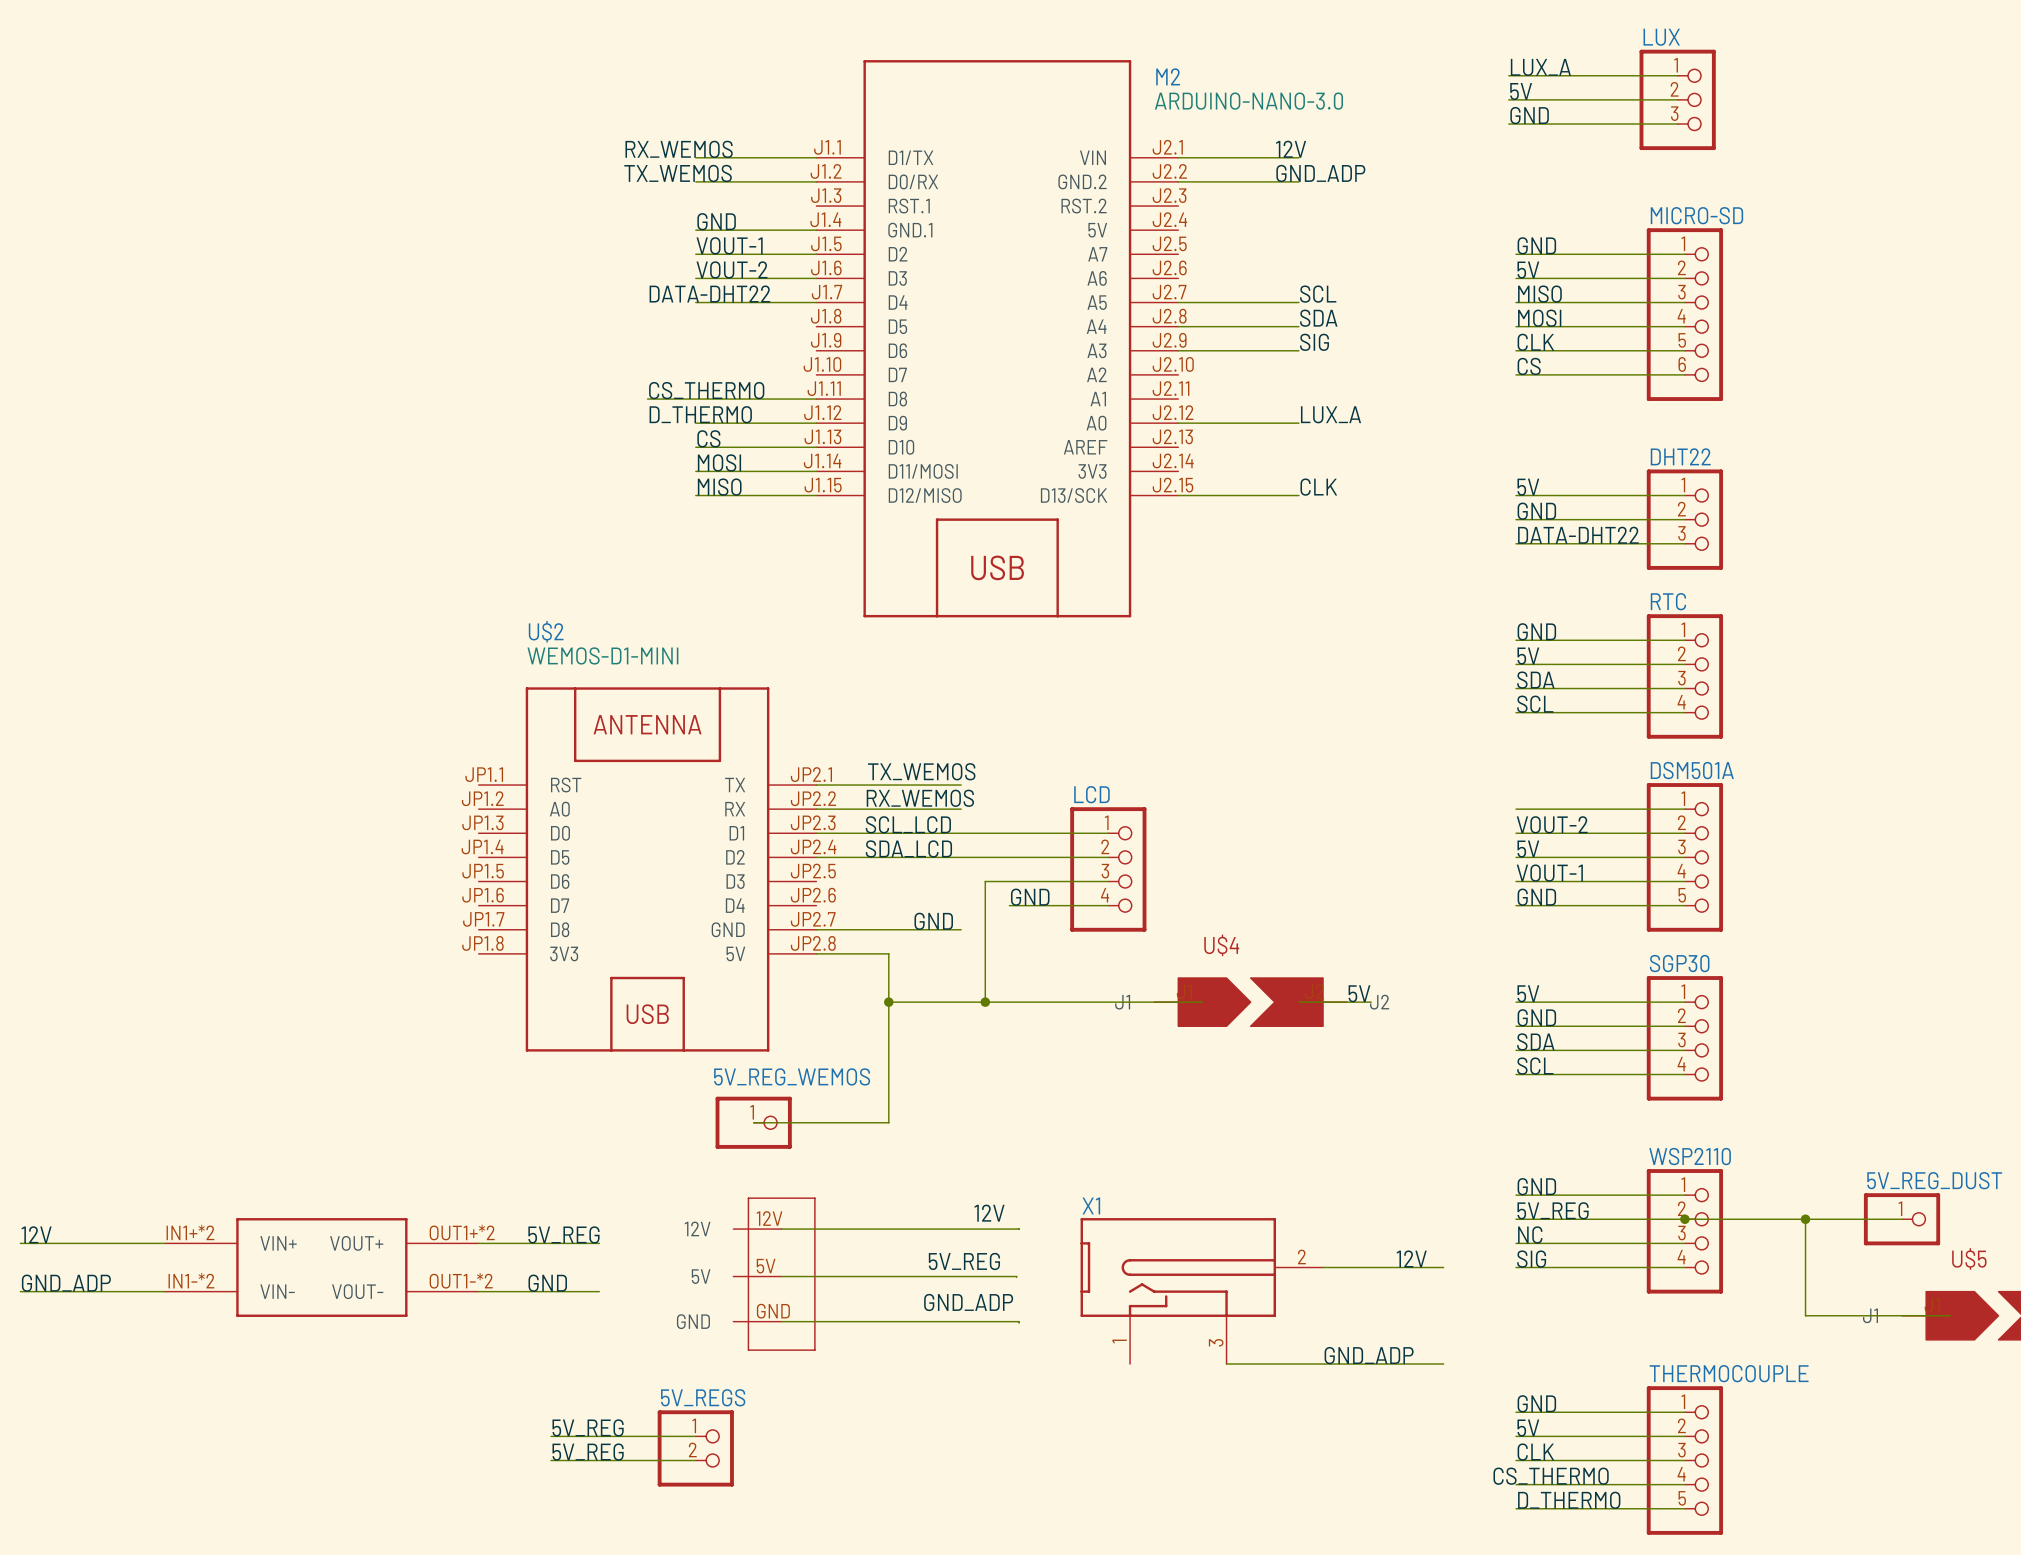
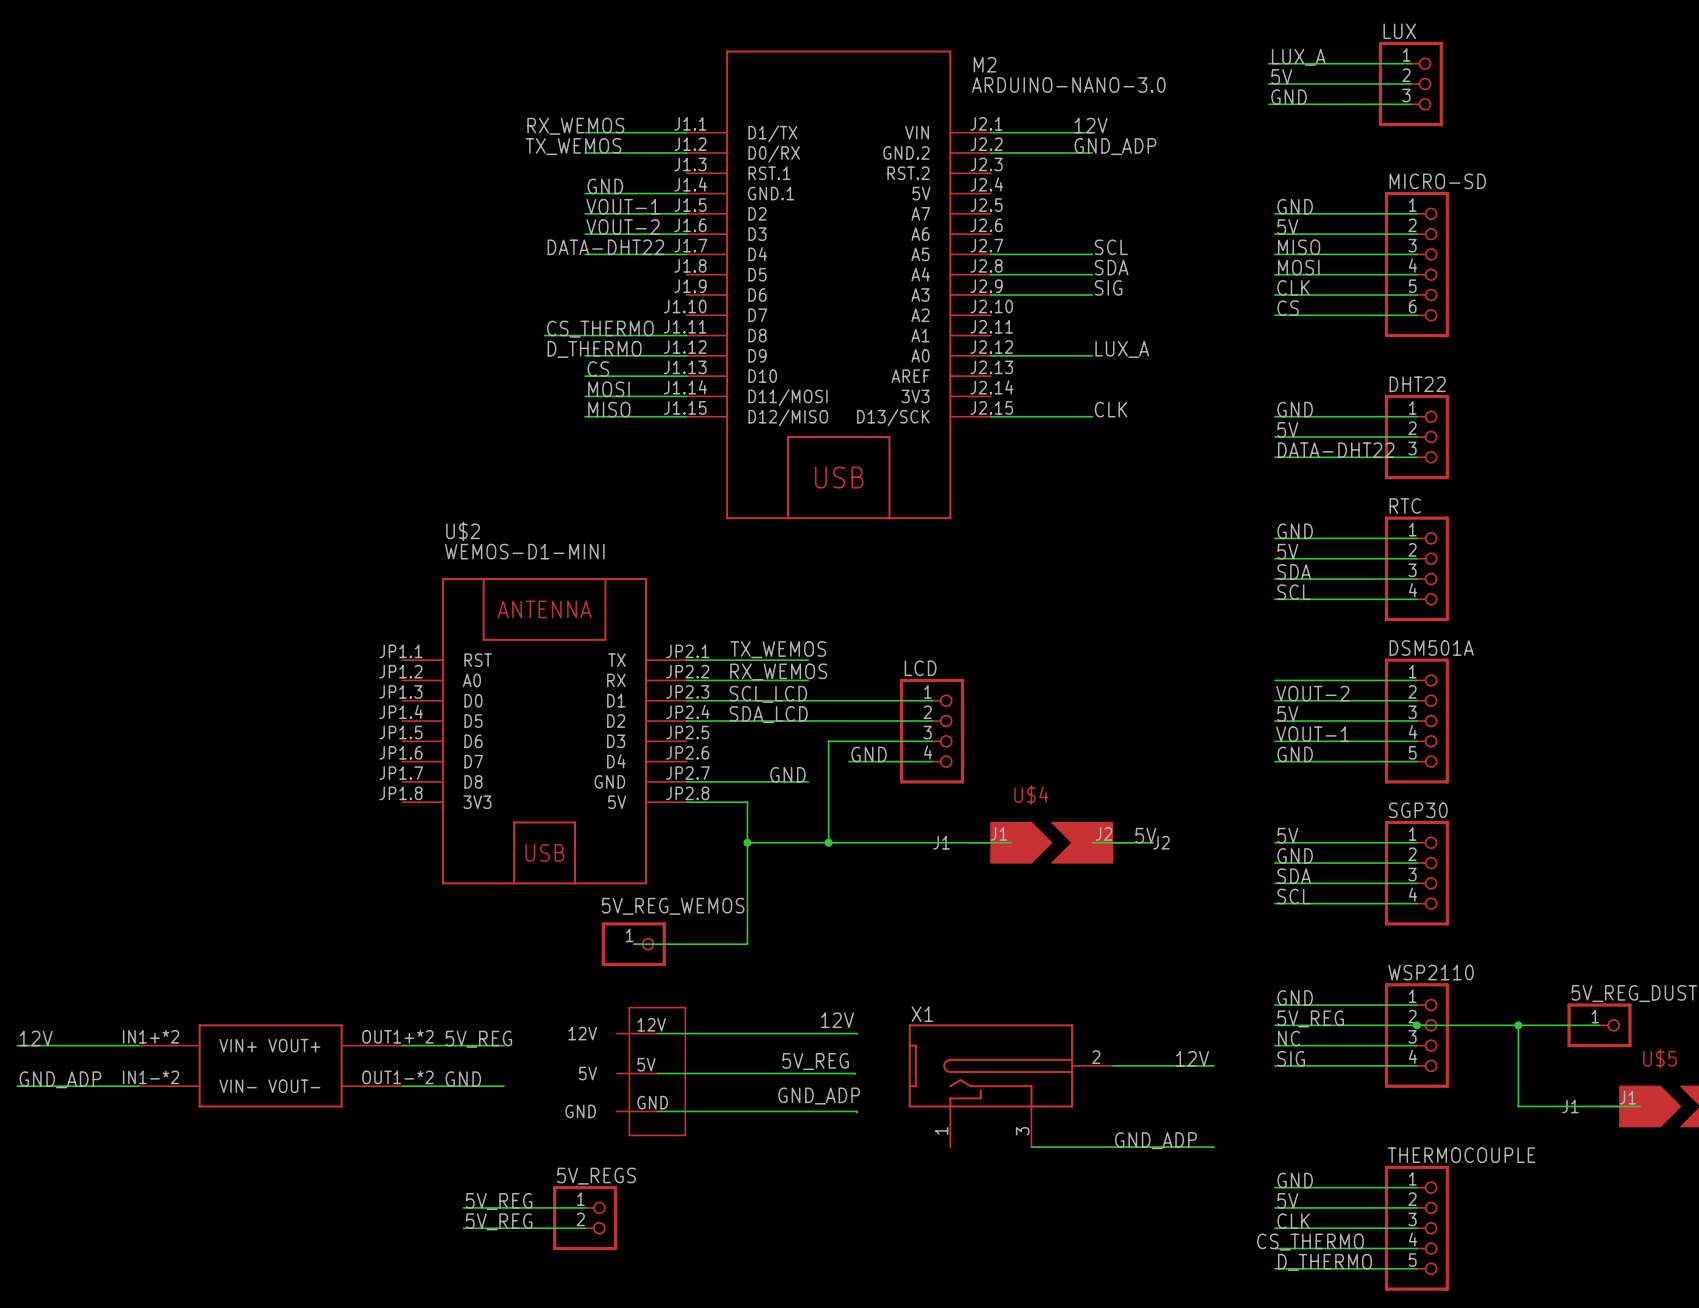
label: 5V (1528, 487) -> GND (1295, 409)
label: GND (1536, 511) -> 5V (1287, 429)

